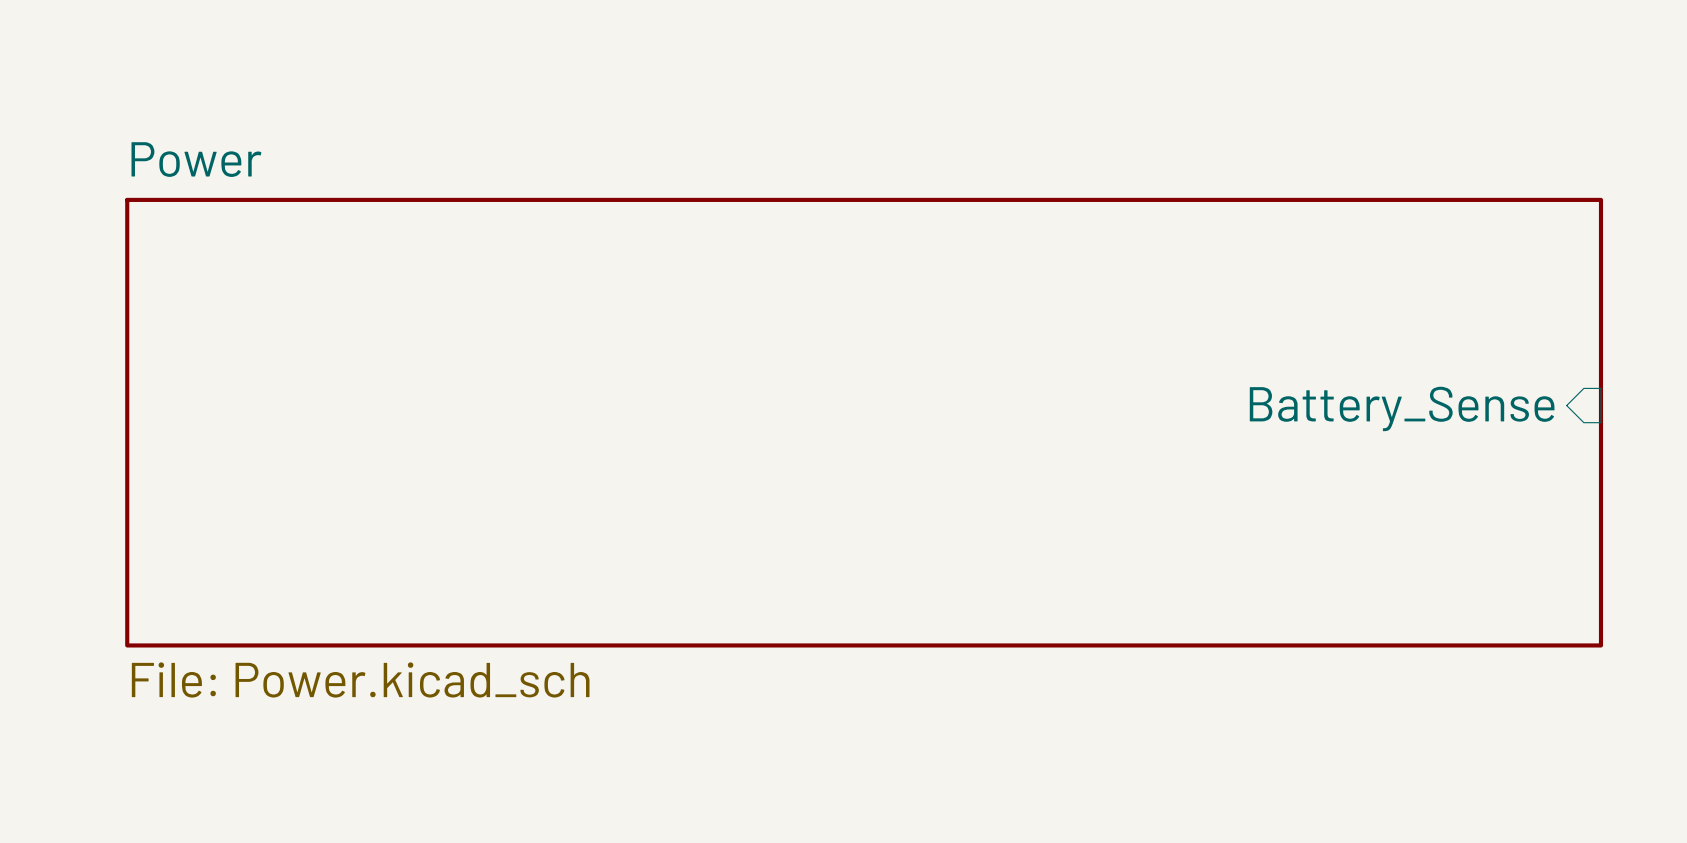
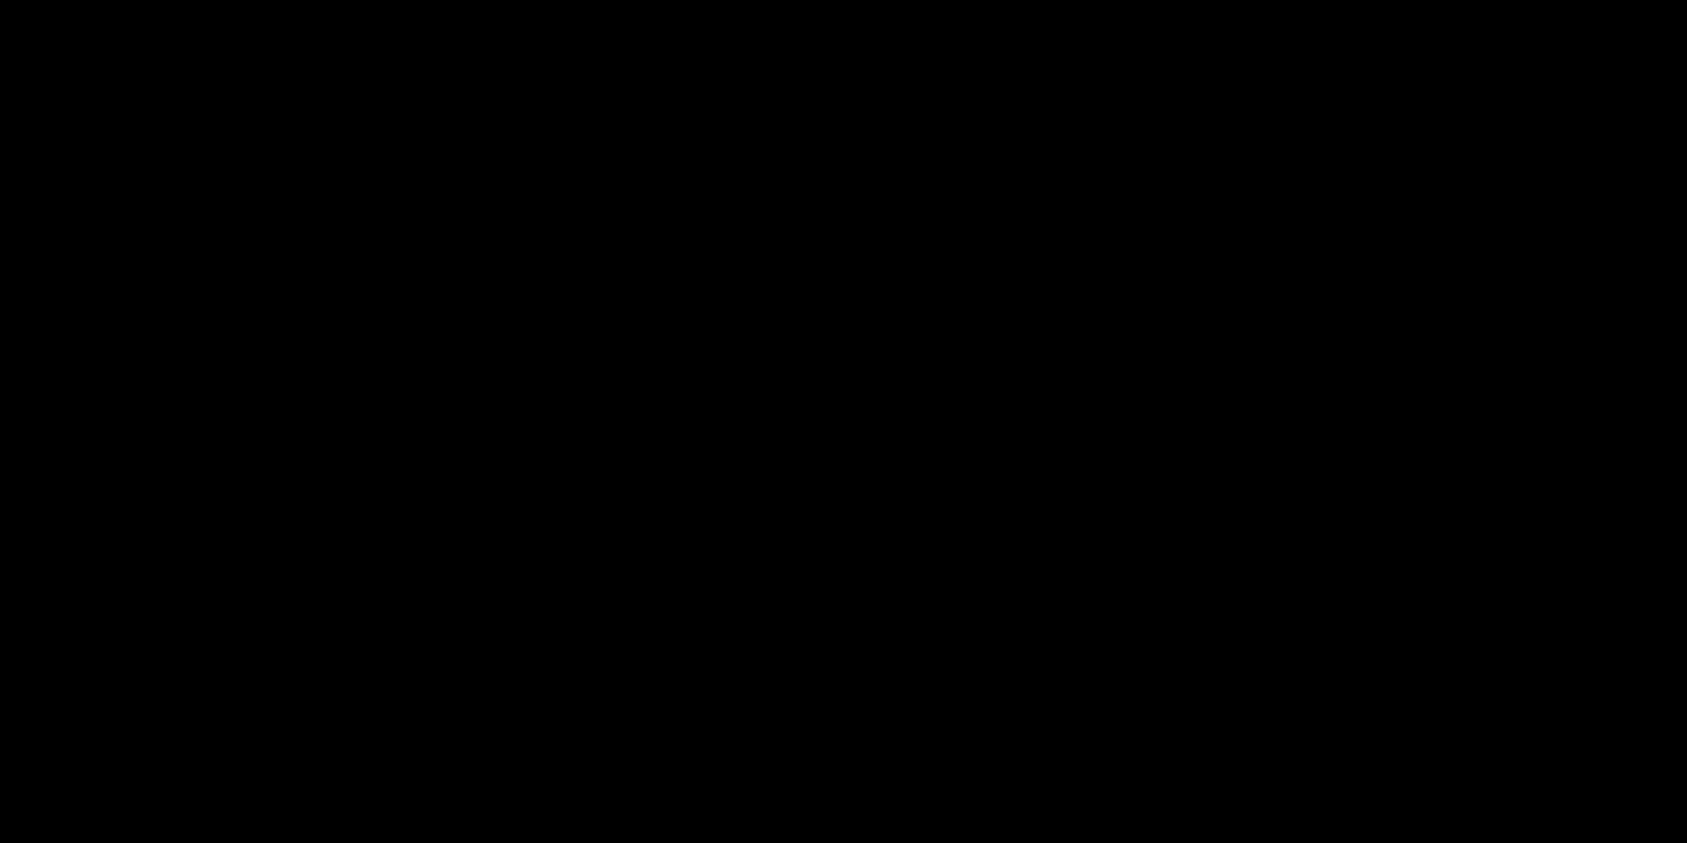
sheet pin: Battery_Sense (1402, 408) -> none
sheet Power: File: Power.kicad_sch (864, 422) -> none

